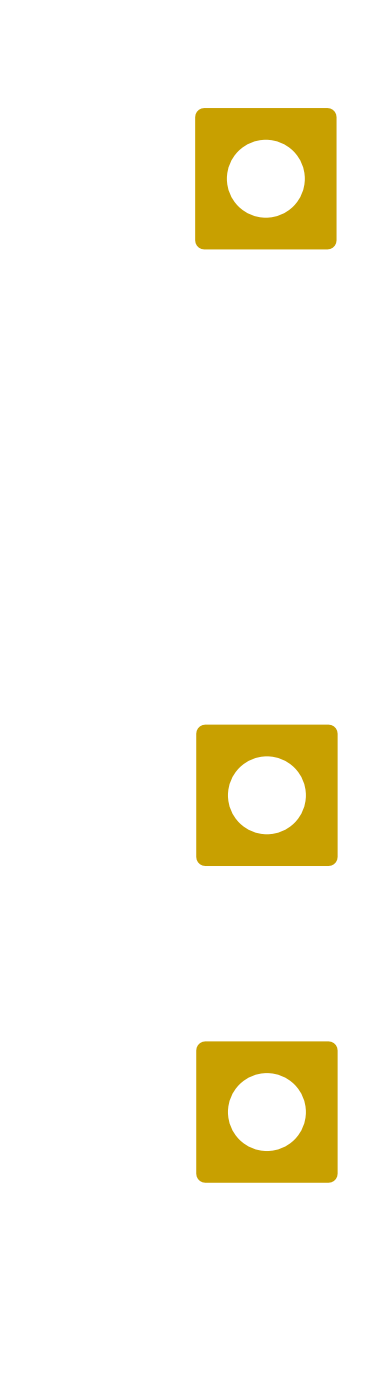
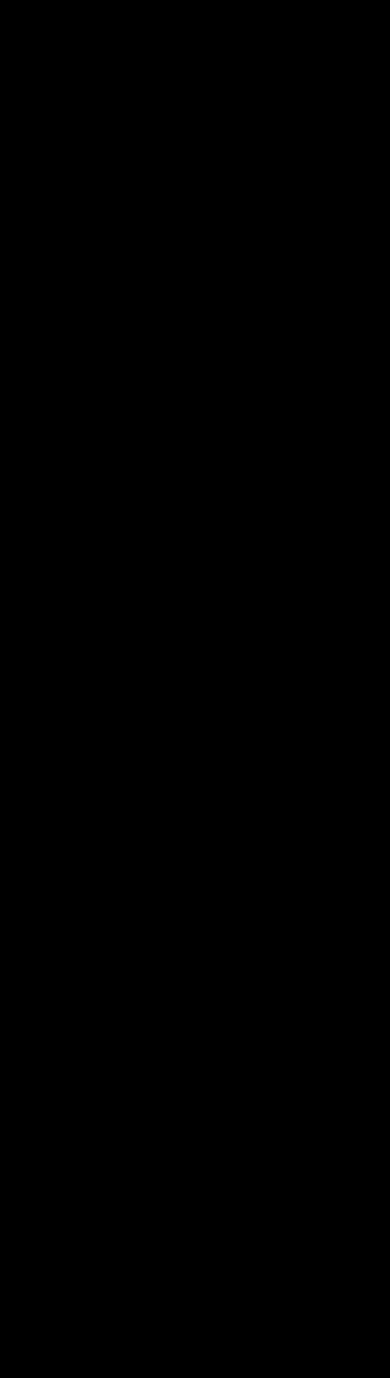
part: (265, 178) -> none
part: (266, 795) -> none
part: (266, 1112) -> none

